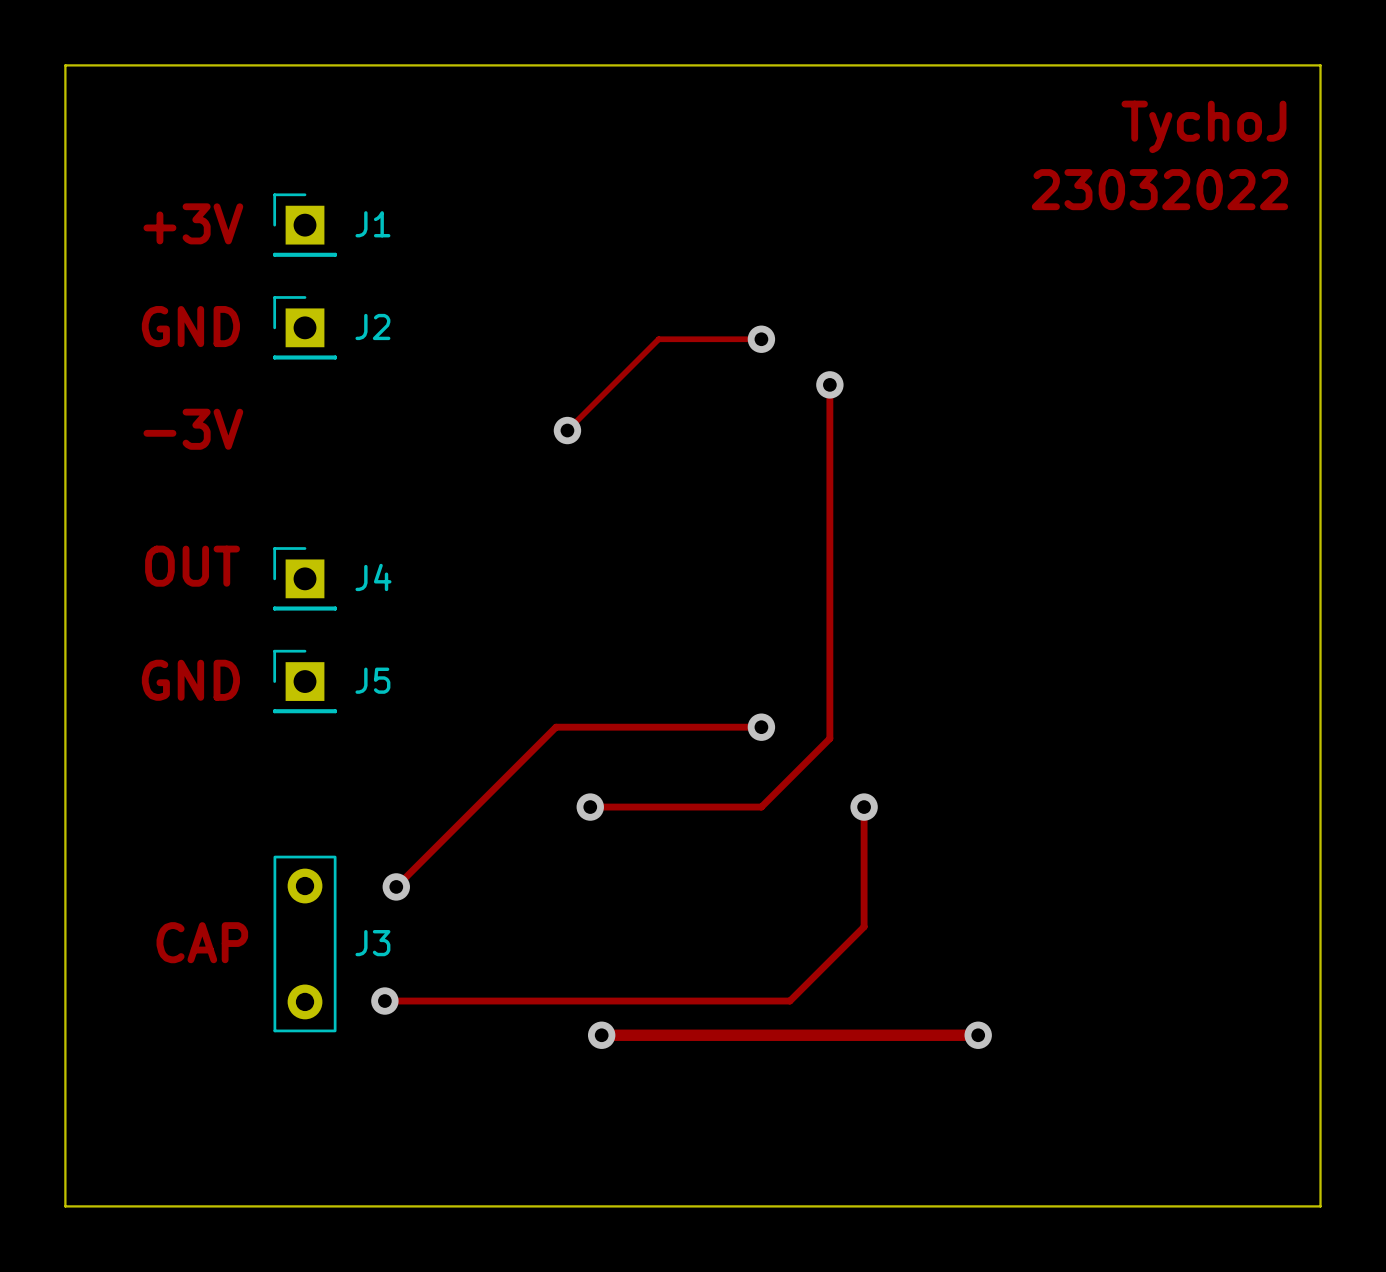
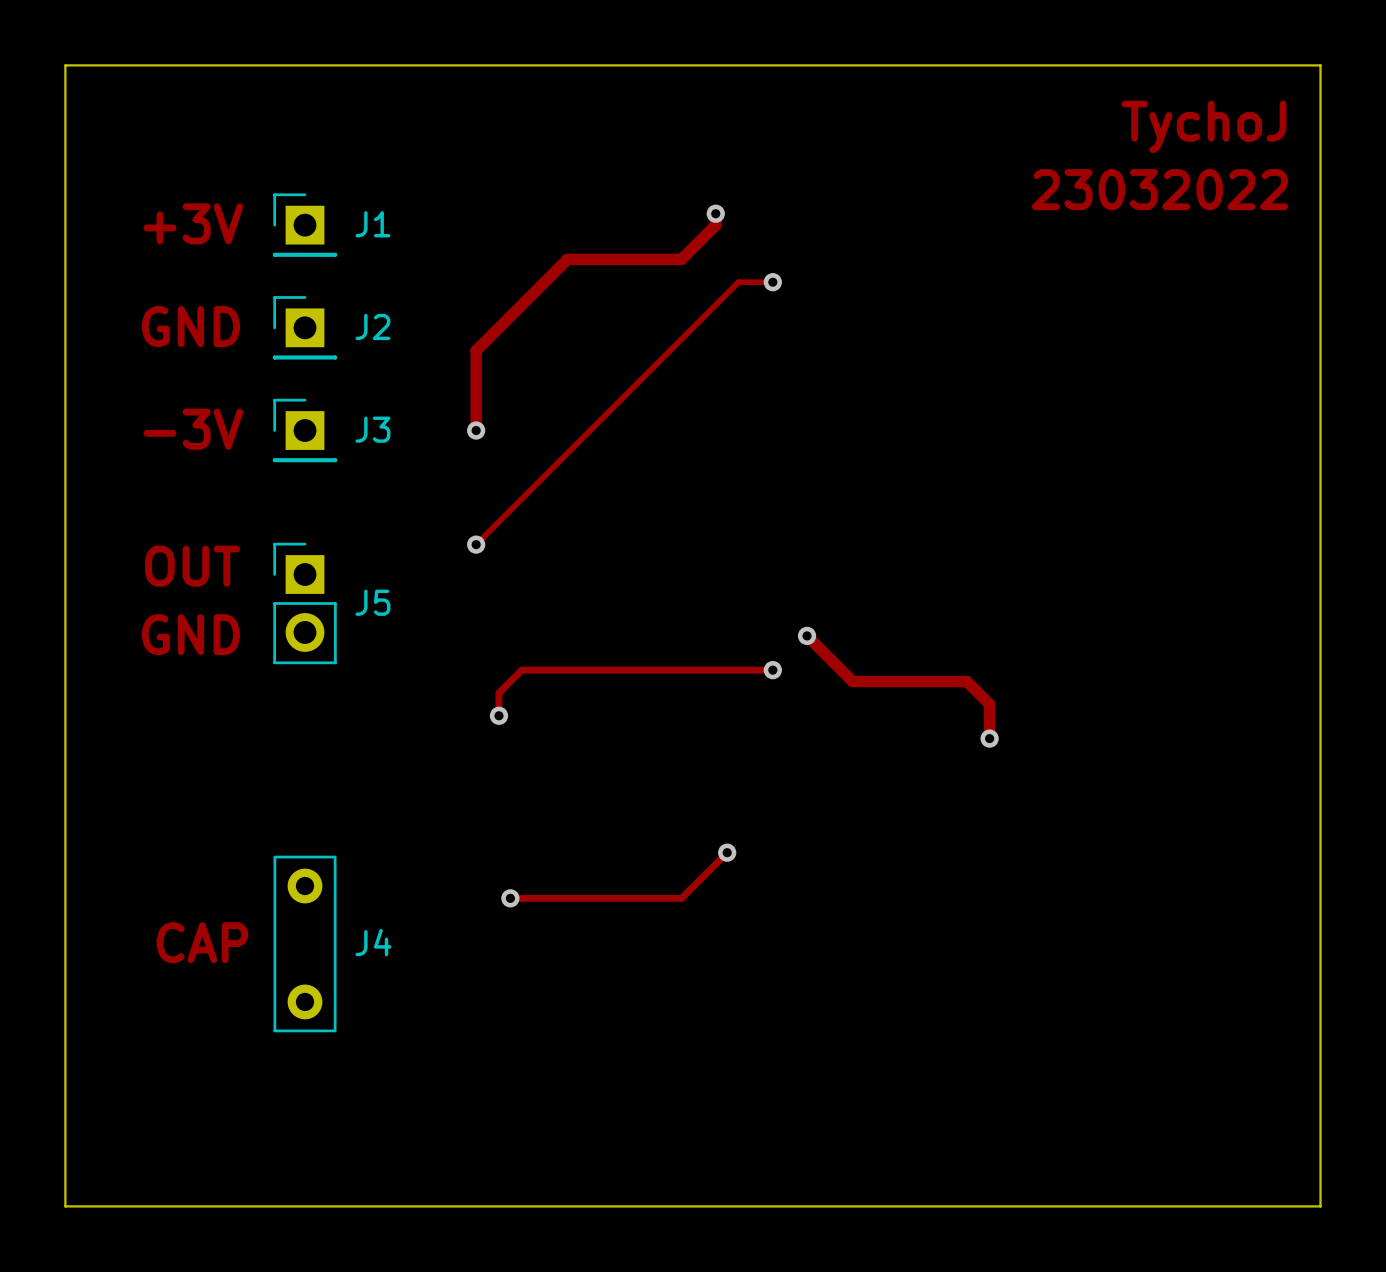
track: none -> (715, 213) (715, 225) (681, 259) (567, 259) (476, 350) (476, 430)
via: none -> (715, 213)
track: none -> (772, 282) (738, 282) (476, 544)
via: none -> (772, 282)
track: (761, 339) (658, 339) (567, 430) -> none
via: (761, 339) -> none
track: (829, 384) (829, 738) (761, 807) (590, 807) -> none
via: (829, 384) -> none
J3: none -> (305, 430)
via: none -> (476, 430)
via: (567, 430) -> none
via: none -> (476, 544)
J4: (305, 578) -> none
track: none -> (807, 635) (852, 681) (966, 681) (989, 704) (989, 738)
via: none -> (807, 635)
J5 footprint: [273, 649, 337, 714] -> [273, 542, 337, 665]
track: none -> (772, 670) (521, 670) (498, 692) (498, 715)
via: none -> (772, 670)
text position: GND (190, 680) -> GND (190, 634)
via: none -> (498, 715)
track: (761, 727) (556, 727) (396, 886) -> none
via: (761, 727) -> none
via: none -> (989, 738)
via: (590, 807) -> none
track: (864, 807) (864, 926) (789, 1001) (384, 1001) -> none
via: (864, 807) -> none
track: none -> (727, 852) (681, 898) (510, 898)
via: none -> (727, 852)
via: (396, 886) -> none
via: none -> (510, 898)
J3 name: J3 (372, 943) -> J4 (373, 942)
via: (384, 1001) -> none
track: (601, 1035) (978, 1035) -> none
via: (601, 1035) -> none
via: (978, 1035) -> none

